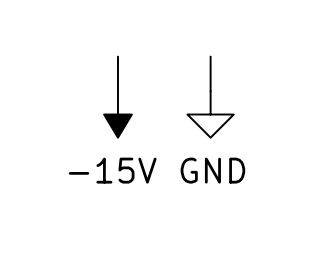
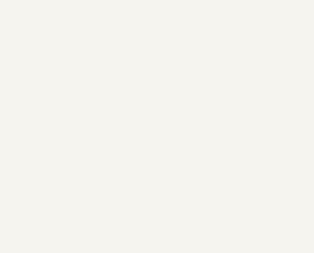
wire: (117, 56) (117, 91) -> none
wire: (210, 56) (210, 91) -> none
power symbol: -15V (117, 114) -> none
power symbol: GND (210, 114) -> none

